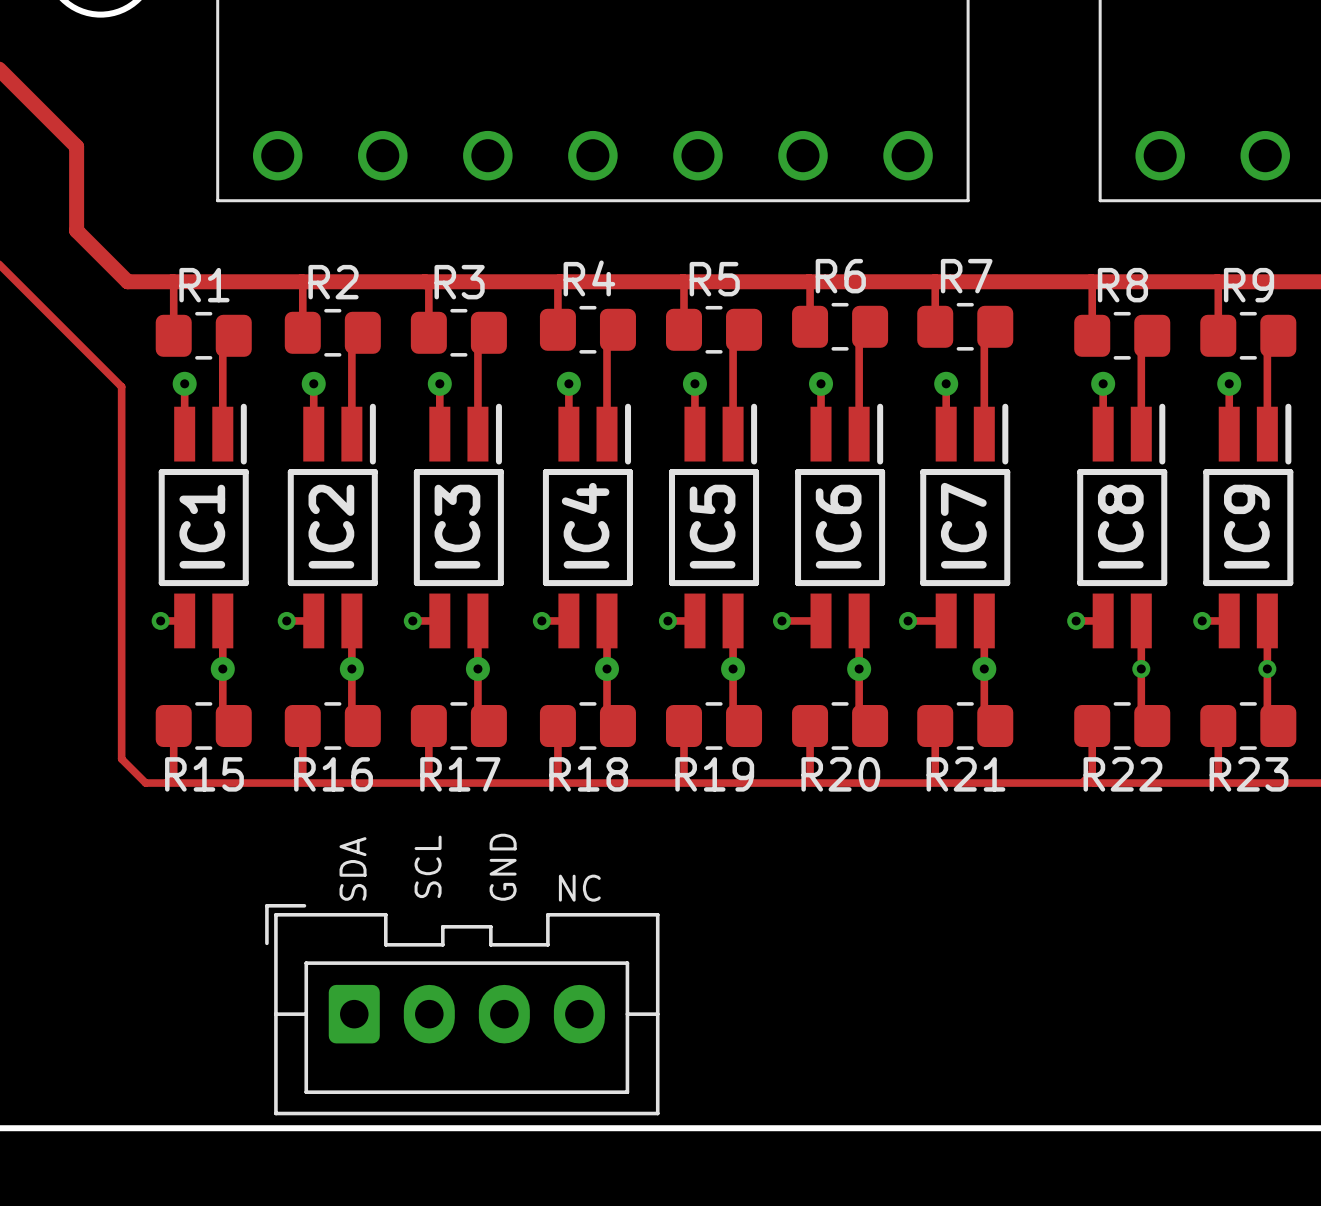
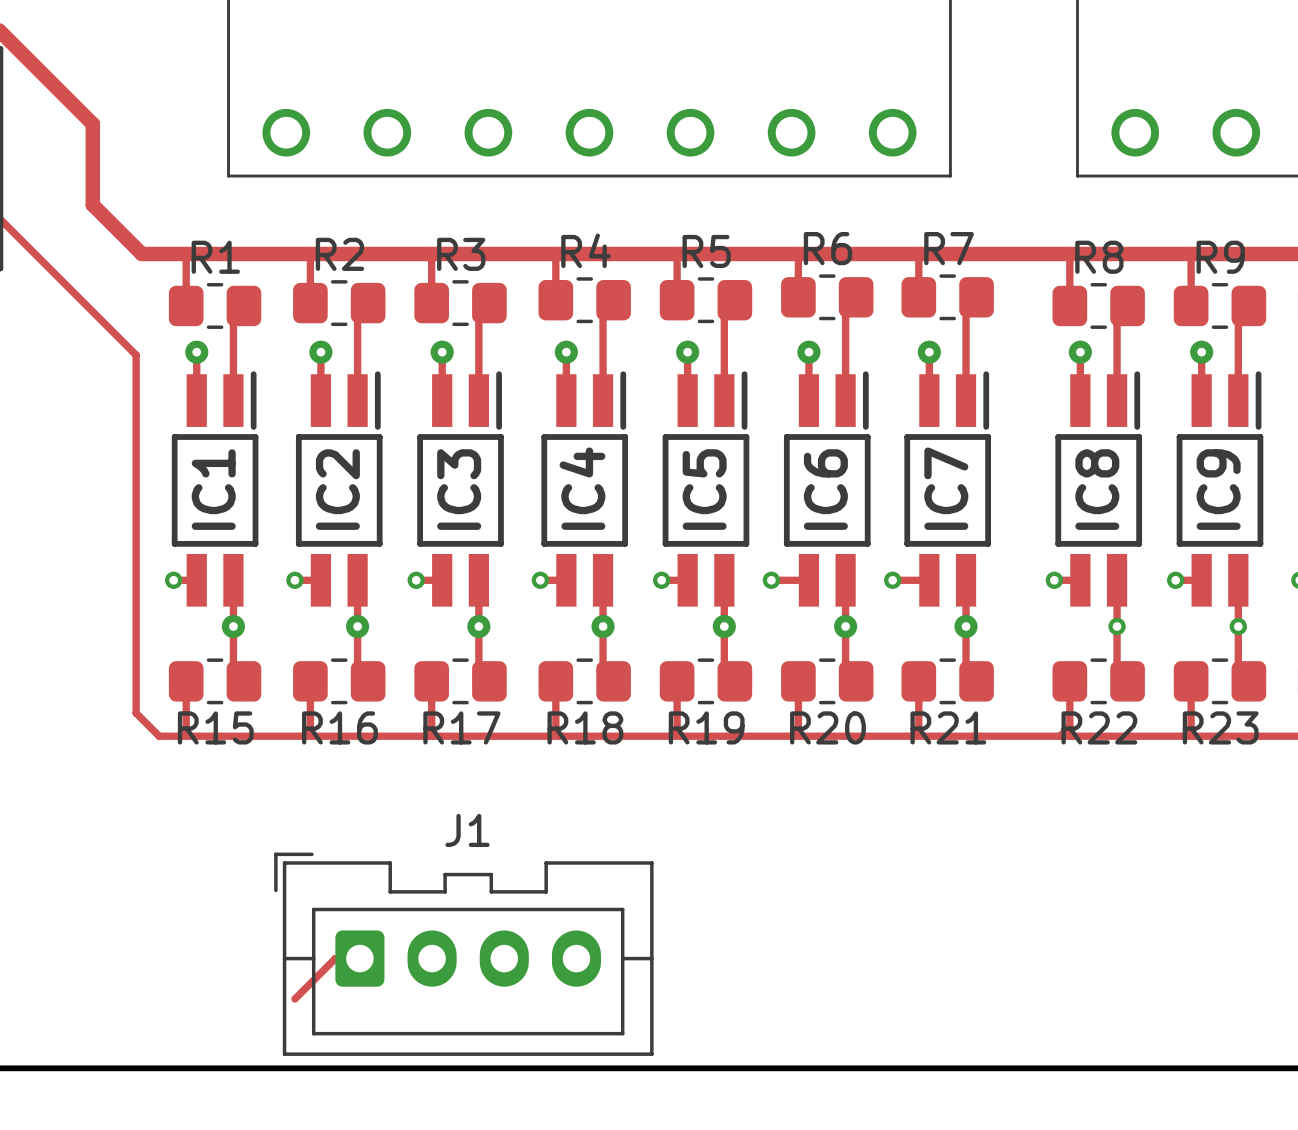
text: SCL (428, 866) -> none
text: GND (503, 867) -> none
text: SDA (353, 868) -> none
J1 name: none -> J1 (467, 830)
text: NC (579, 888) -> none
track: none -> (359, 958) (335, 958) (294, 999)

